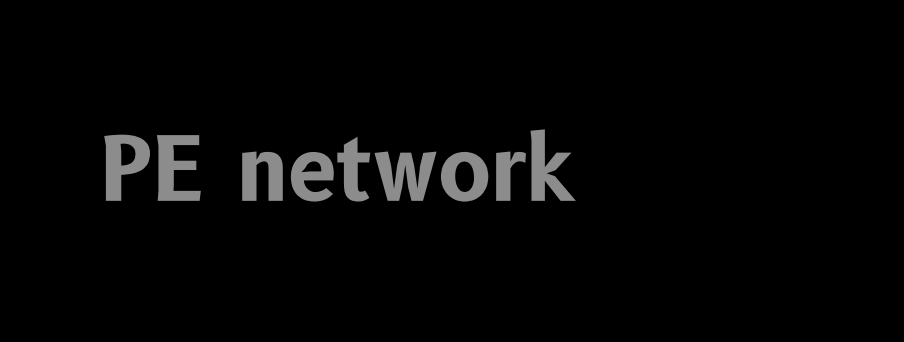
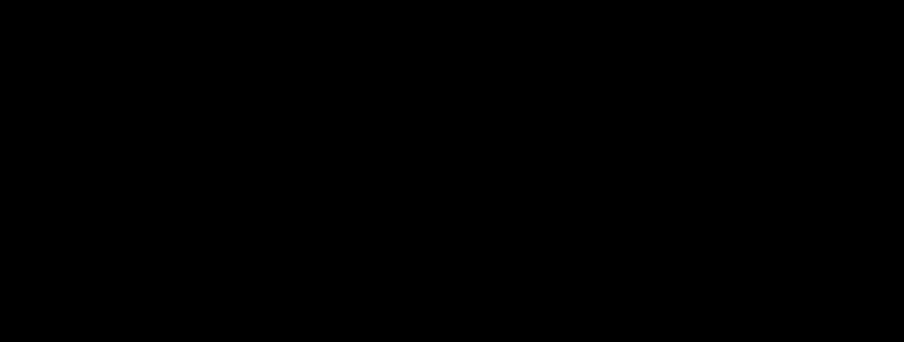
text: PE network (340, 165) -> none

